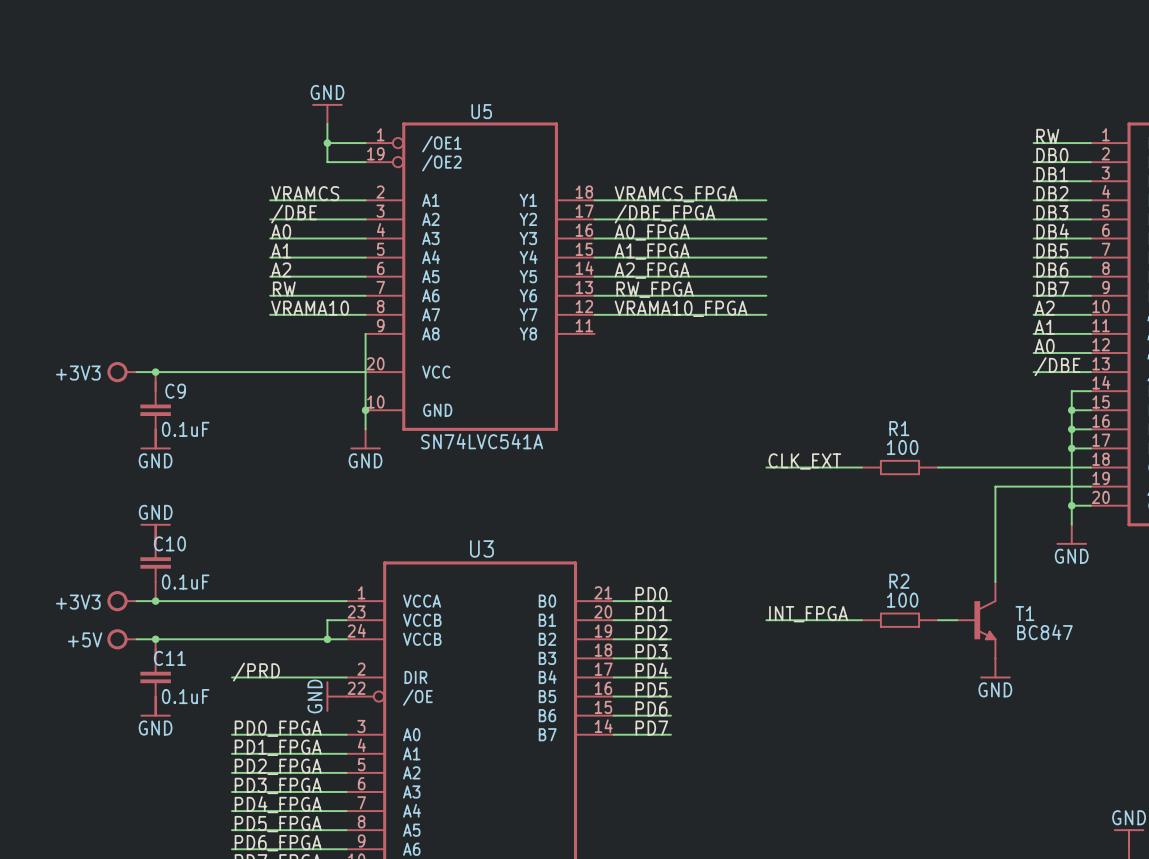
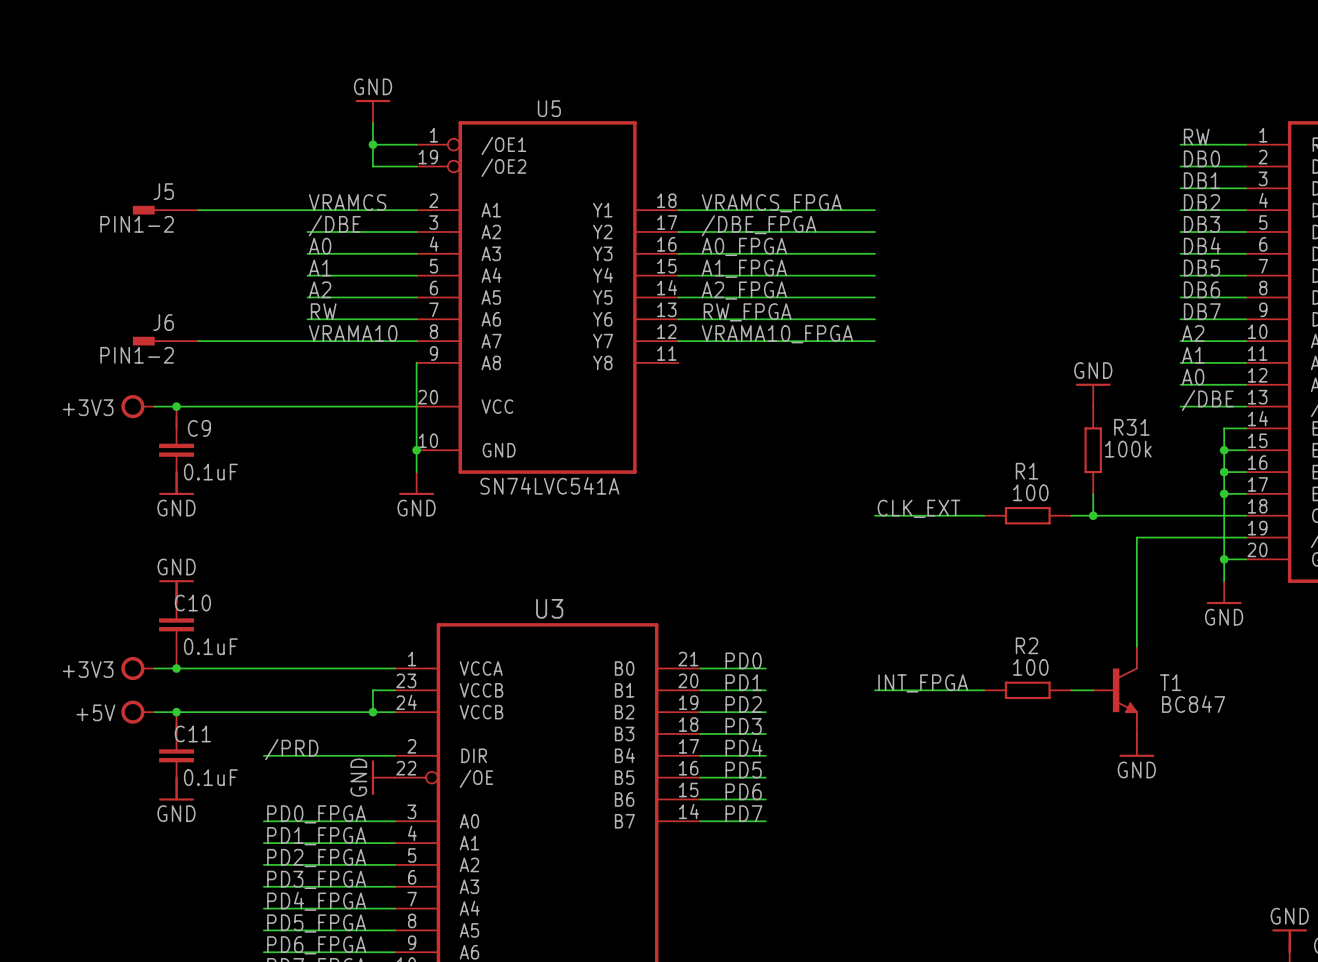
J5: none -> PIN1-2 (165, 210)
wire: none -> (198, 210) (307, 210)
J6: none -> PIN1-2 (165, 341)
wire: none -> (198, 341) (307, 341)
power symbol: none -> GND (1093, 395)
R31: none -> 100k (1093, 450)
wire: none -> (1093, 493) (1093, 515)
junction: none -> (1093, 515)

